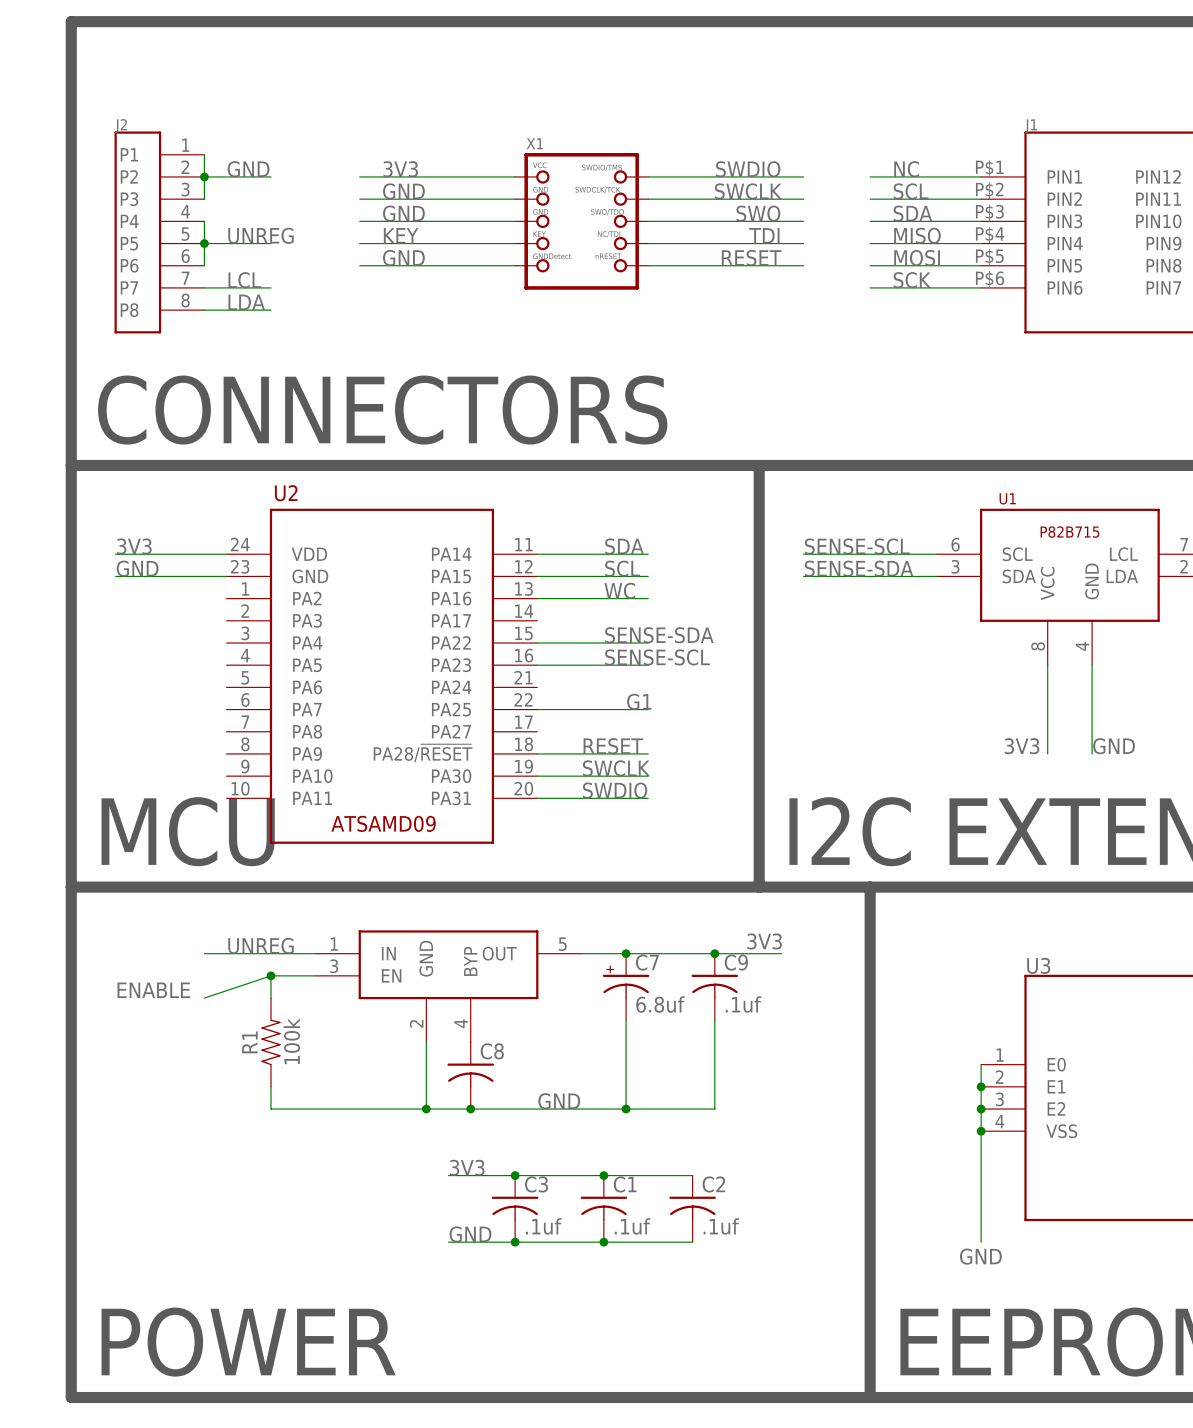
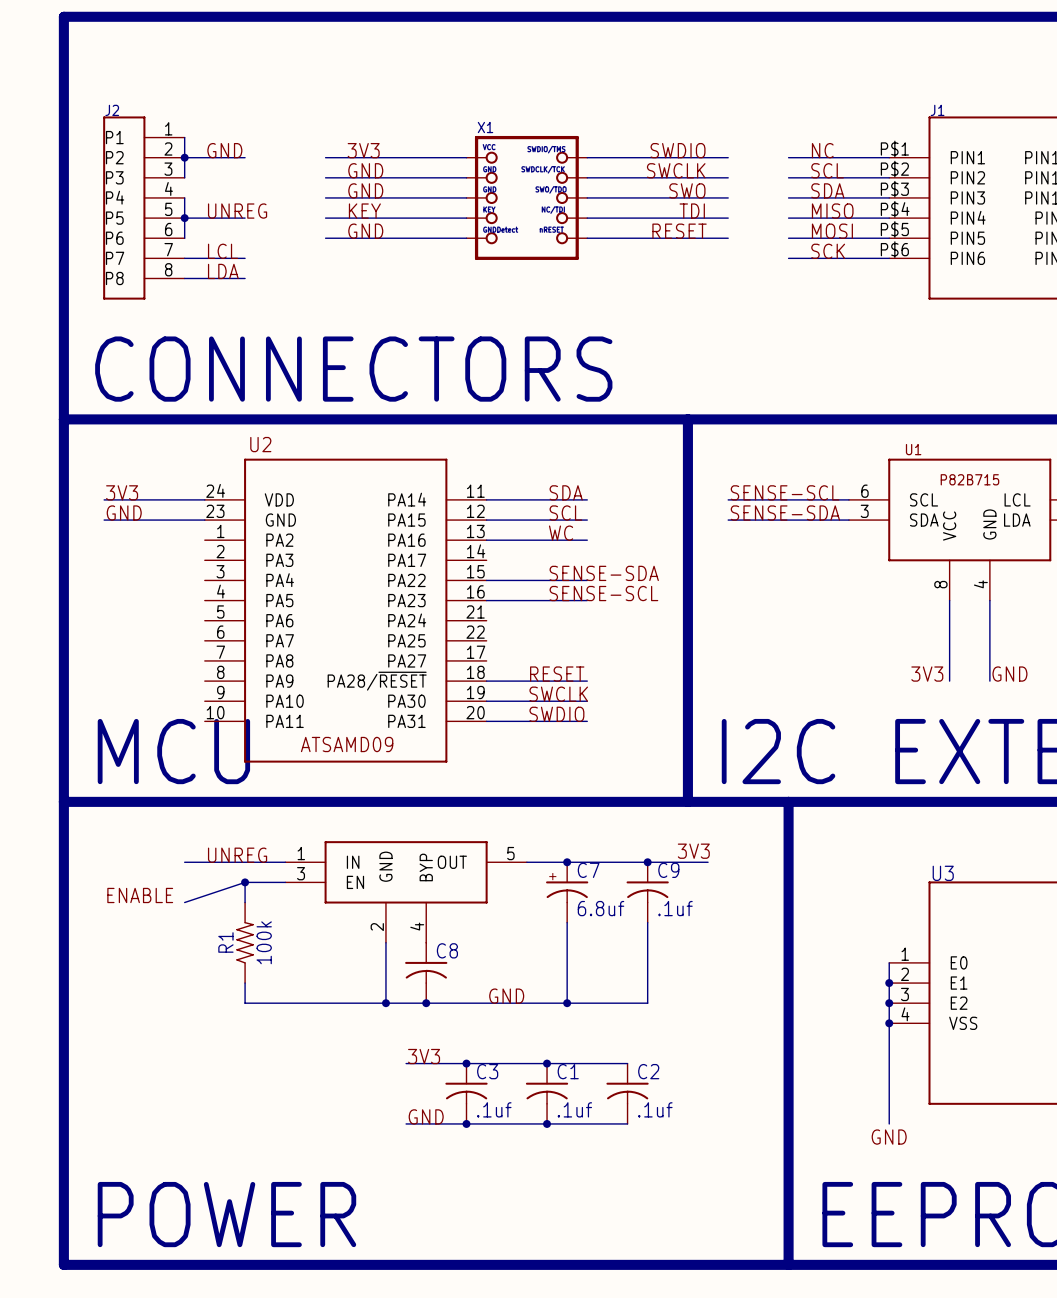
label: G1 (639, 701) -> none
wire: (537, 709) (648, 709) -> none

